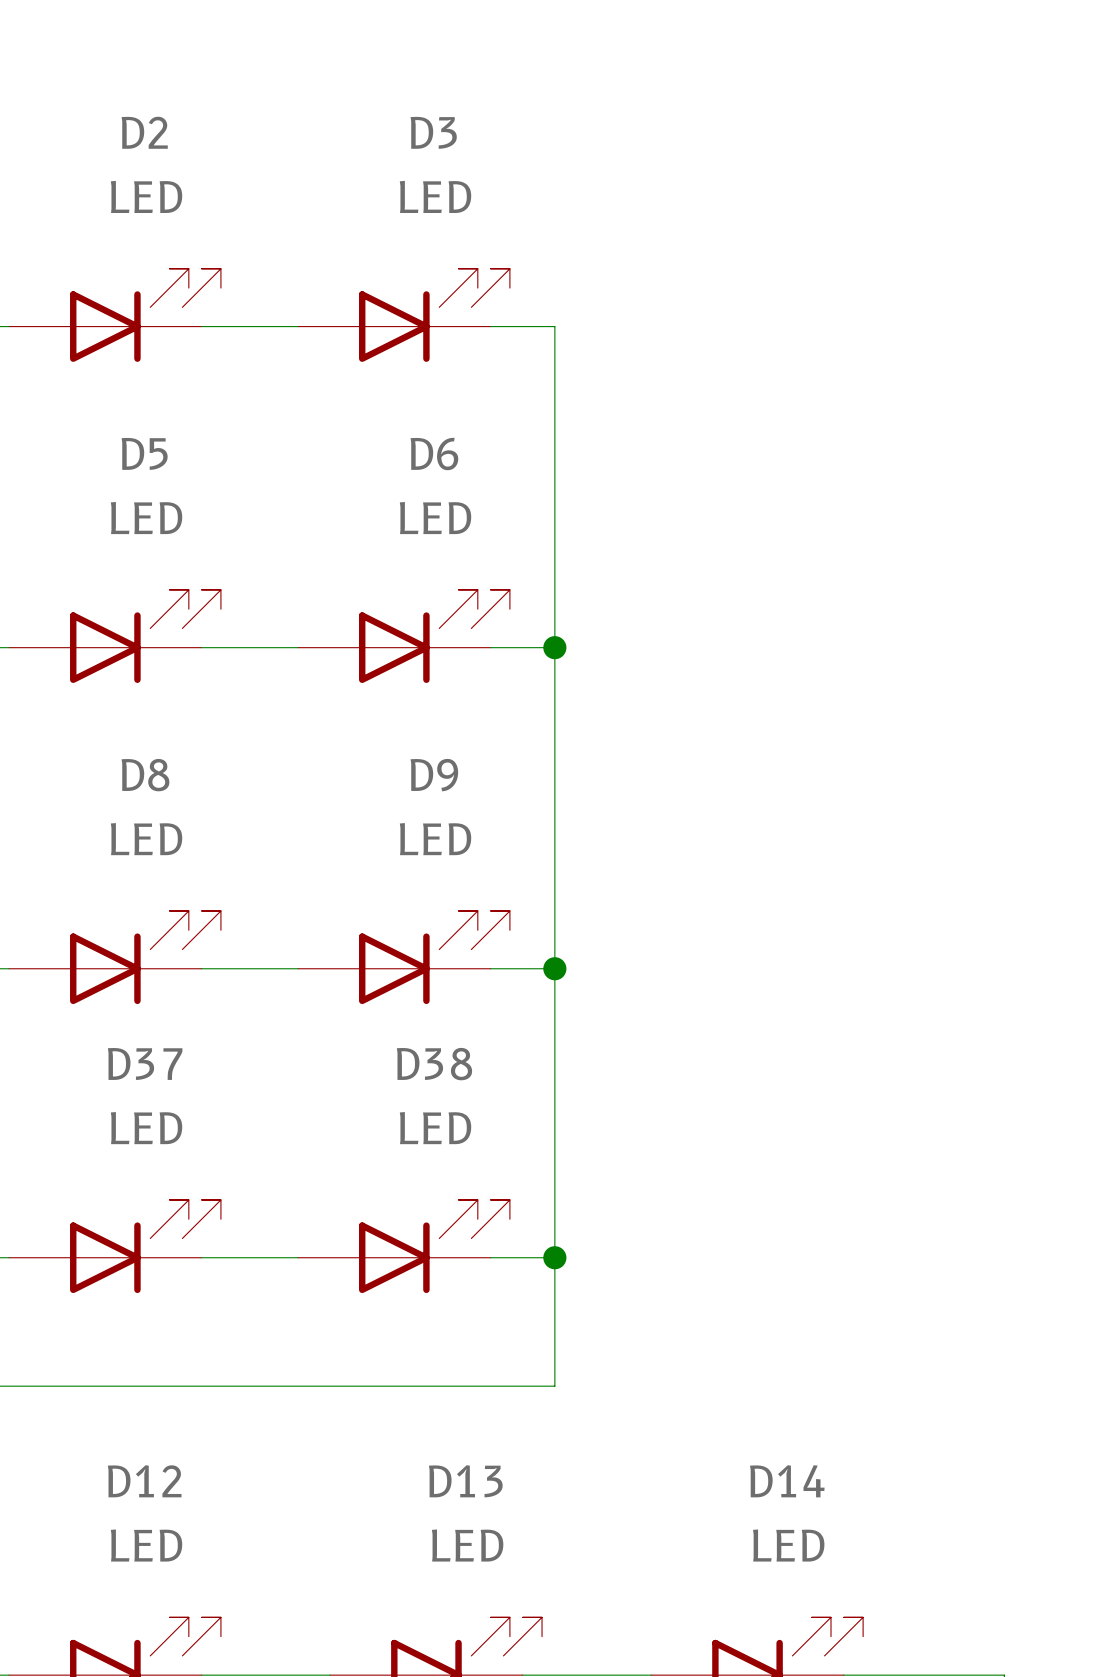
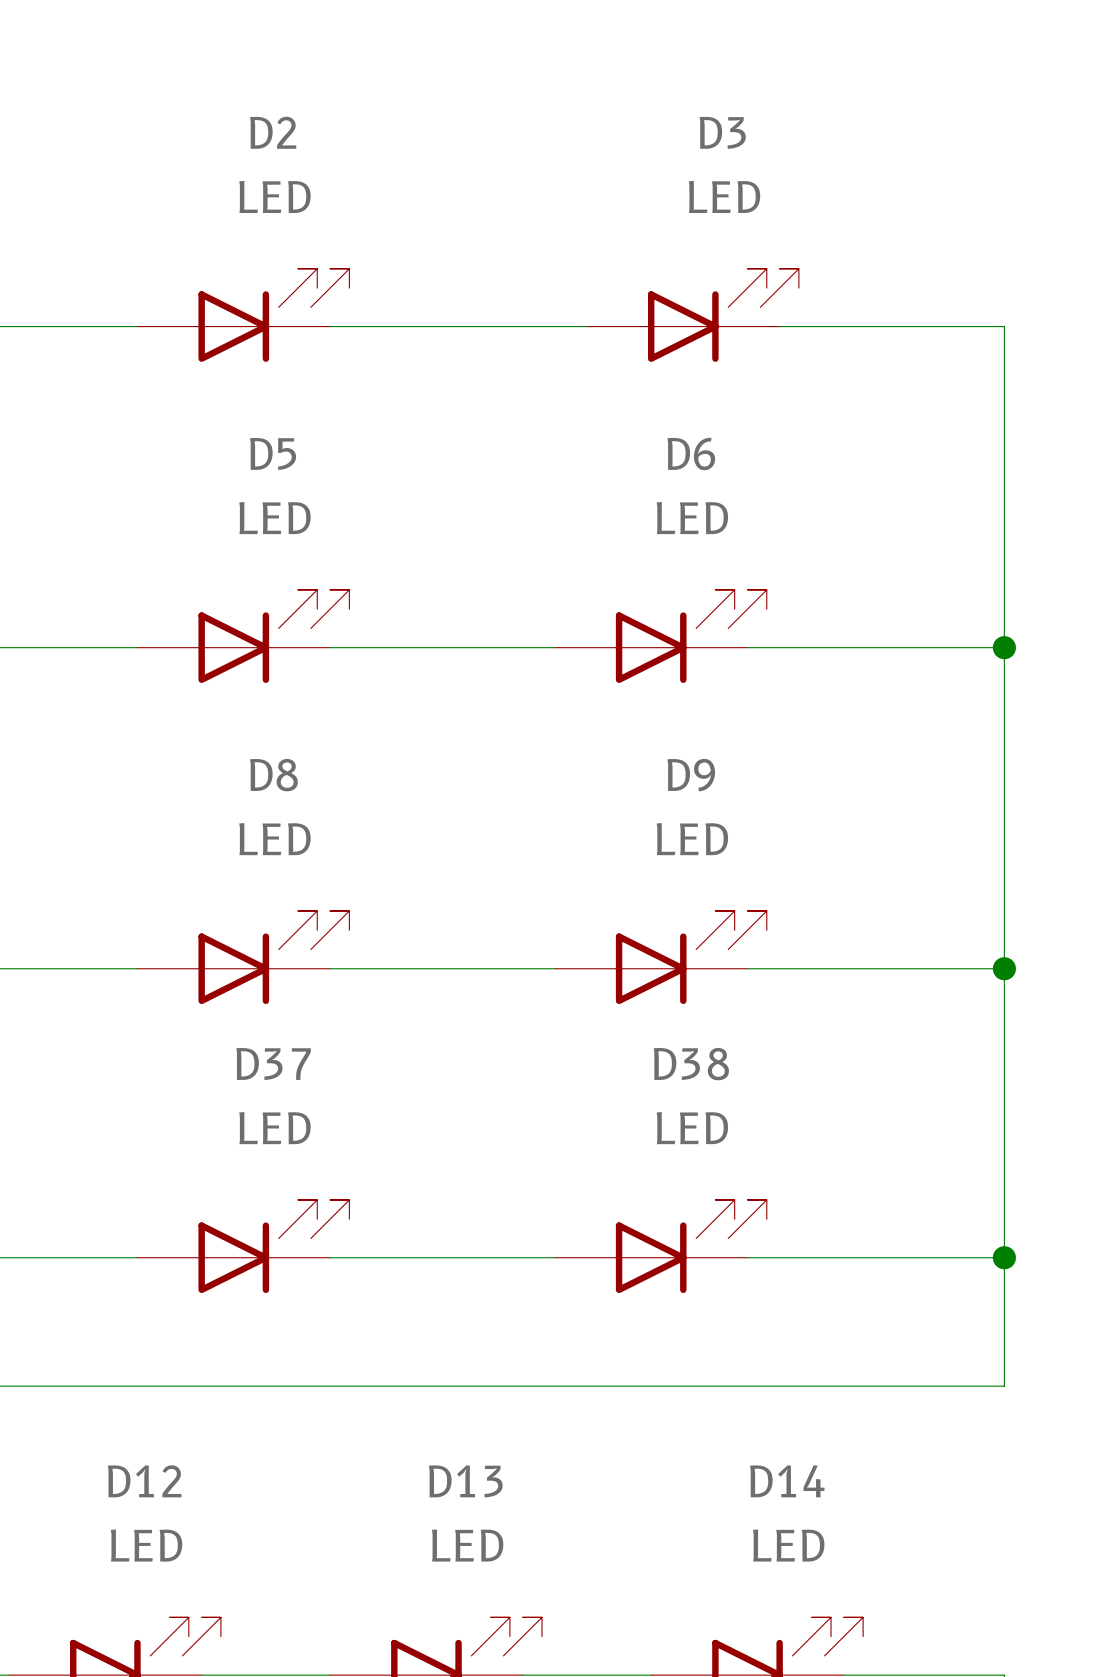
D2 position: (114, 315) -> (243, 315)
D3 position: (403, 315) -> (692, 315)
wire: (554, 326) (554, 1386) -> (779, 326) (1004, 326) (1004, 1386) (554, 1386)
wire: none -> (554, 326) (586, 326)
D5 position: (114, 636) -> (243, 636)
D6 position: (403, 636) -> (660, 636)
junction: (554, 647) -> none
wire: none -> (747, 647) (1004, 647)
junction: none -> (1004, 647)
D8 position: (114, 957) -> (243, 957)
D9 position: (403, 957) -> (660, 957)
junction: (554, 968) -> none
wire: none -> (747, 968) (1004, 968)
junction: none -> (1004, 968)
D37 position: (114, 1246) -> (243, 1246)
D38 position: (403, 1246) -> (660, 1246)
junction: (554, 1257) -> none
wire: none -> (747, 1257) (1004, 1257)
junction: none -> (1004, 1257)

